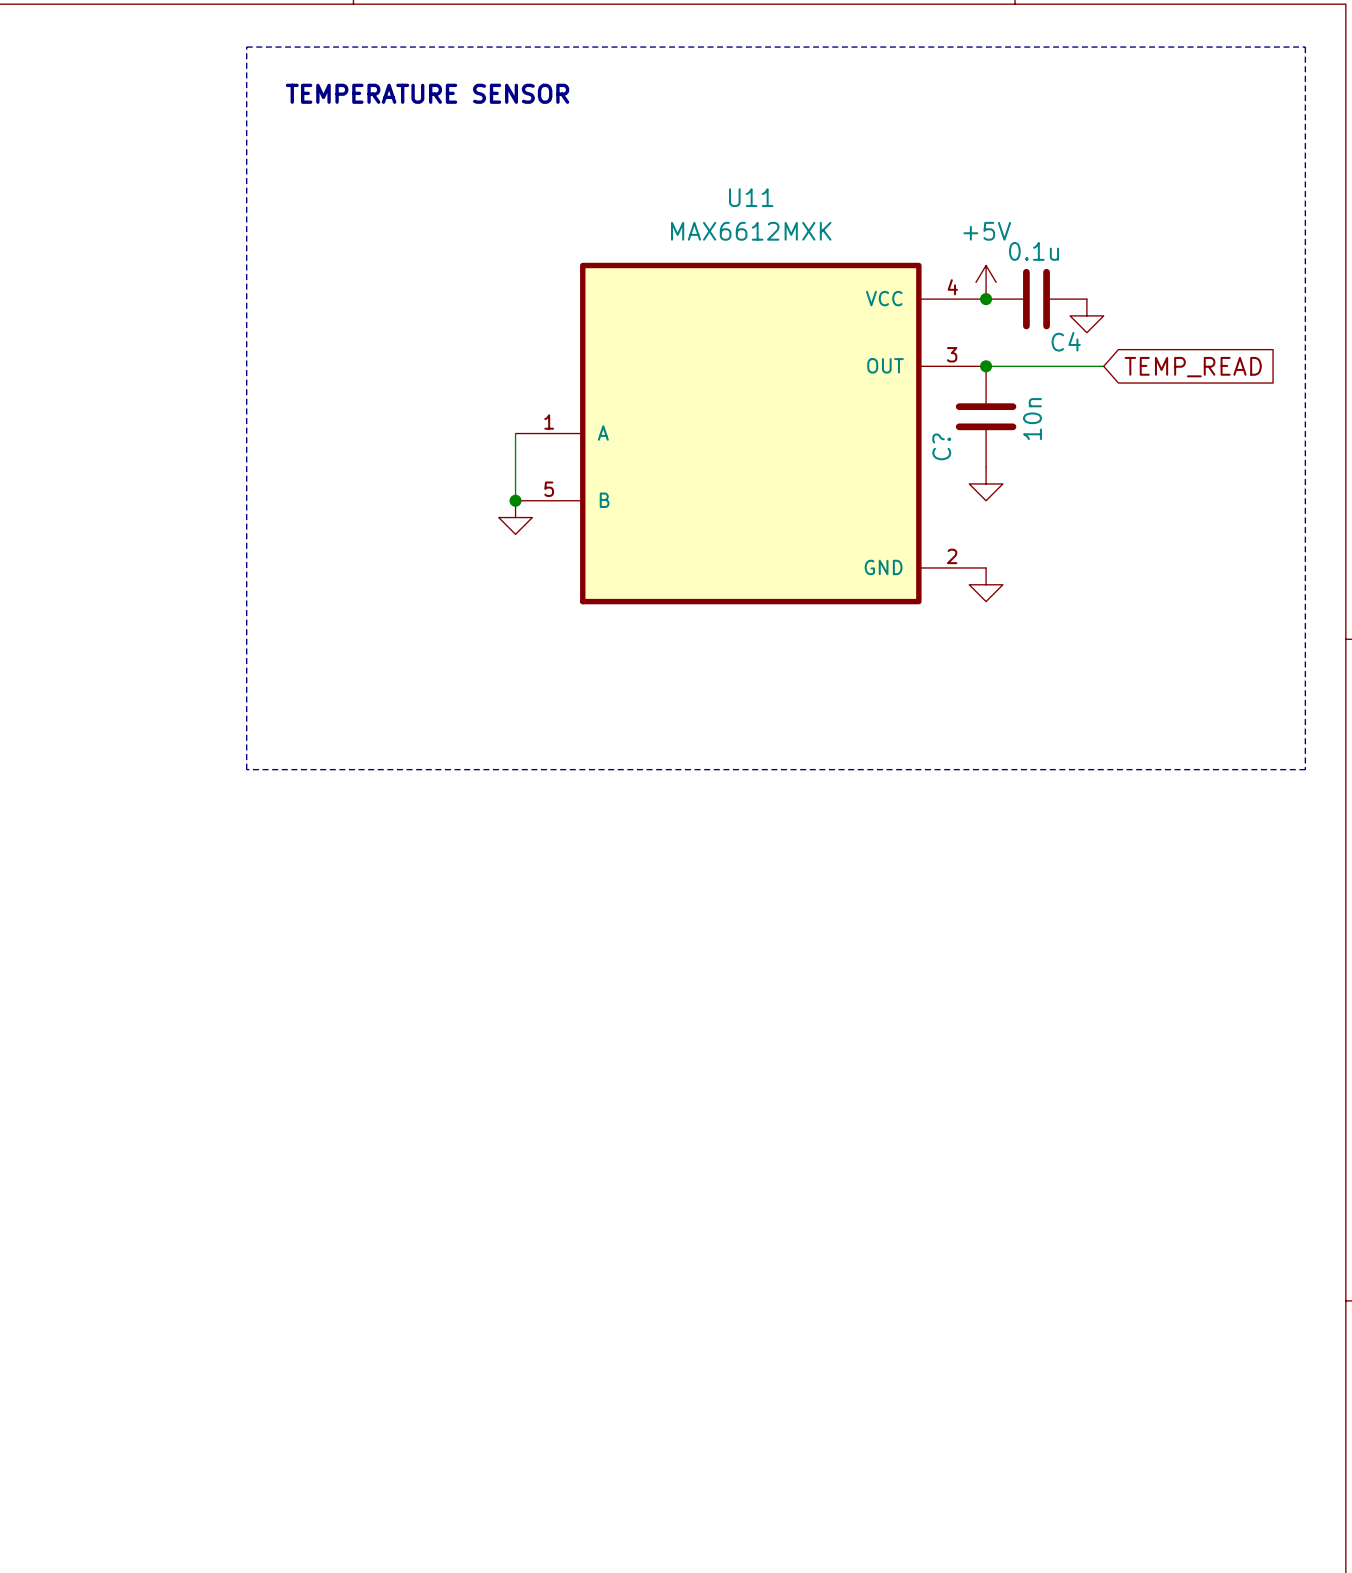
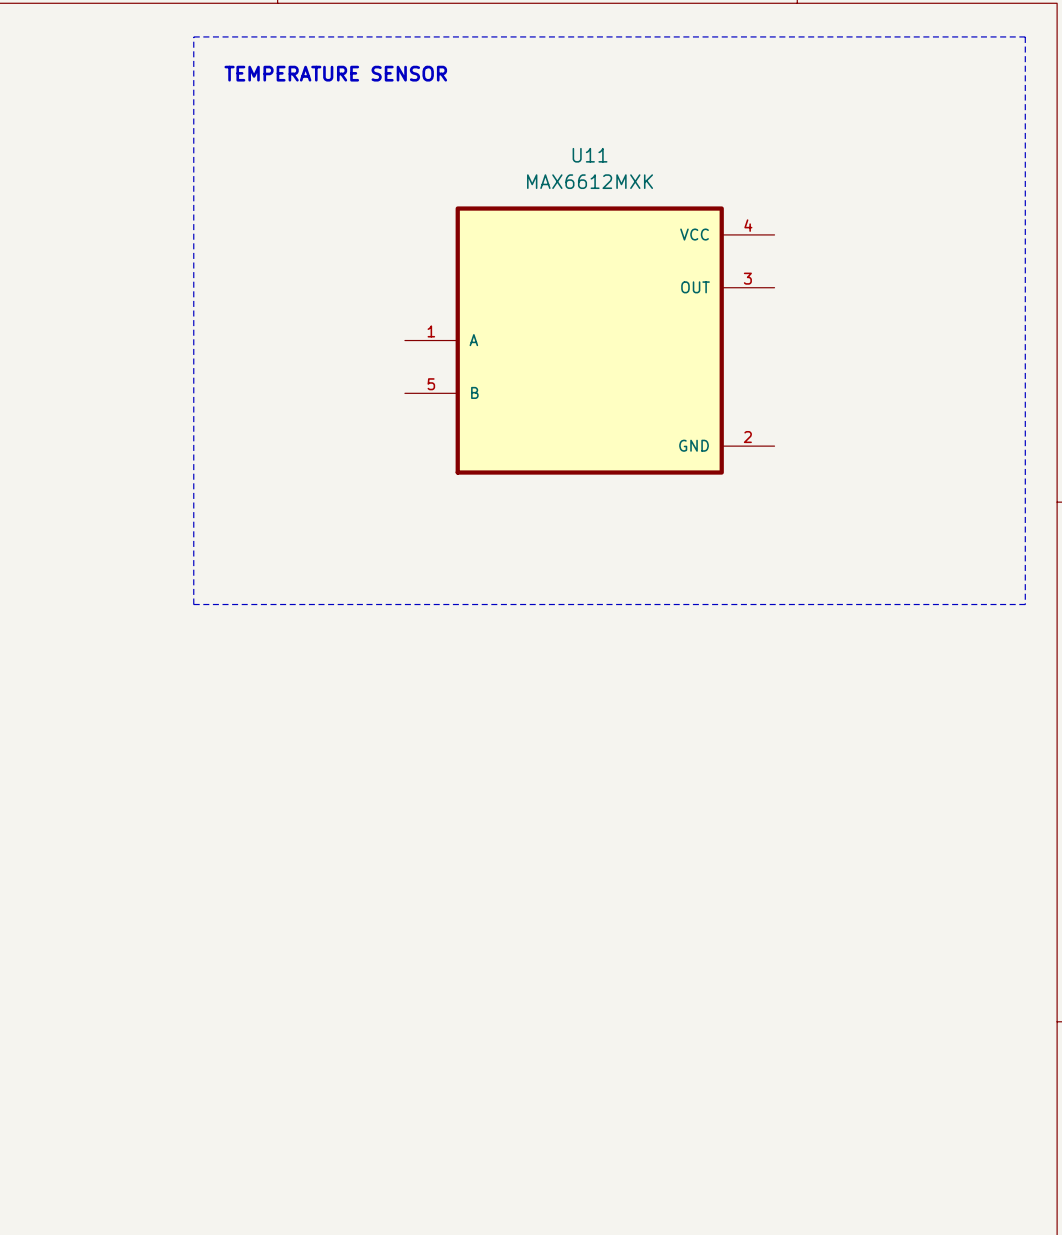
power symbol: +5V (986, 282) -> none
junction: (986, 299) -> none
C4: 0.1u (1036, 299) -> none
power symbol: (1086, 315) -> none
wire: (986, 366) (1103, 366) -> none
junction: (986, 366) -> none
global label: TEMP_READ (1193, 367) -> none
C?: 10n (986, 416) -> none
wire: (515, 433) (515, 500) -> none
power symbol: (986, 483) -> none
junction: (515, 500) -> none
power symbol: (515, 517) -> none
power symbol: (986, 584) -> none

